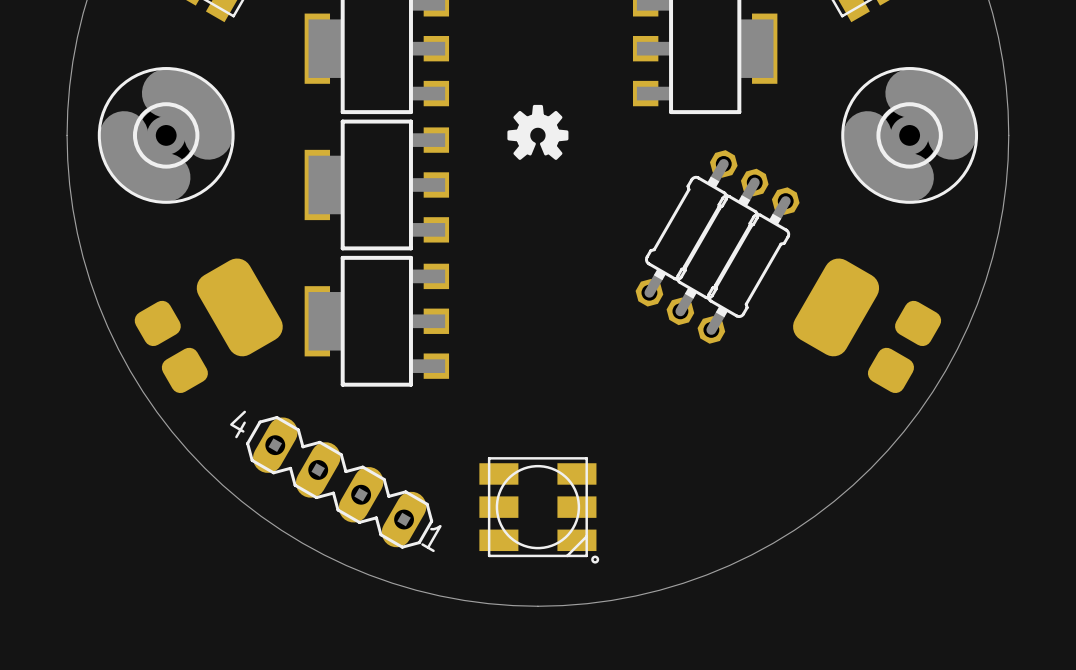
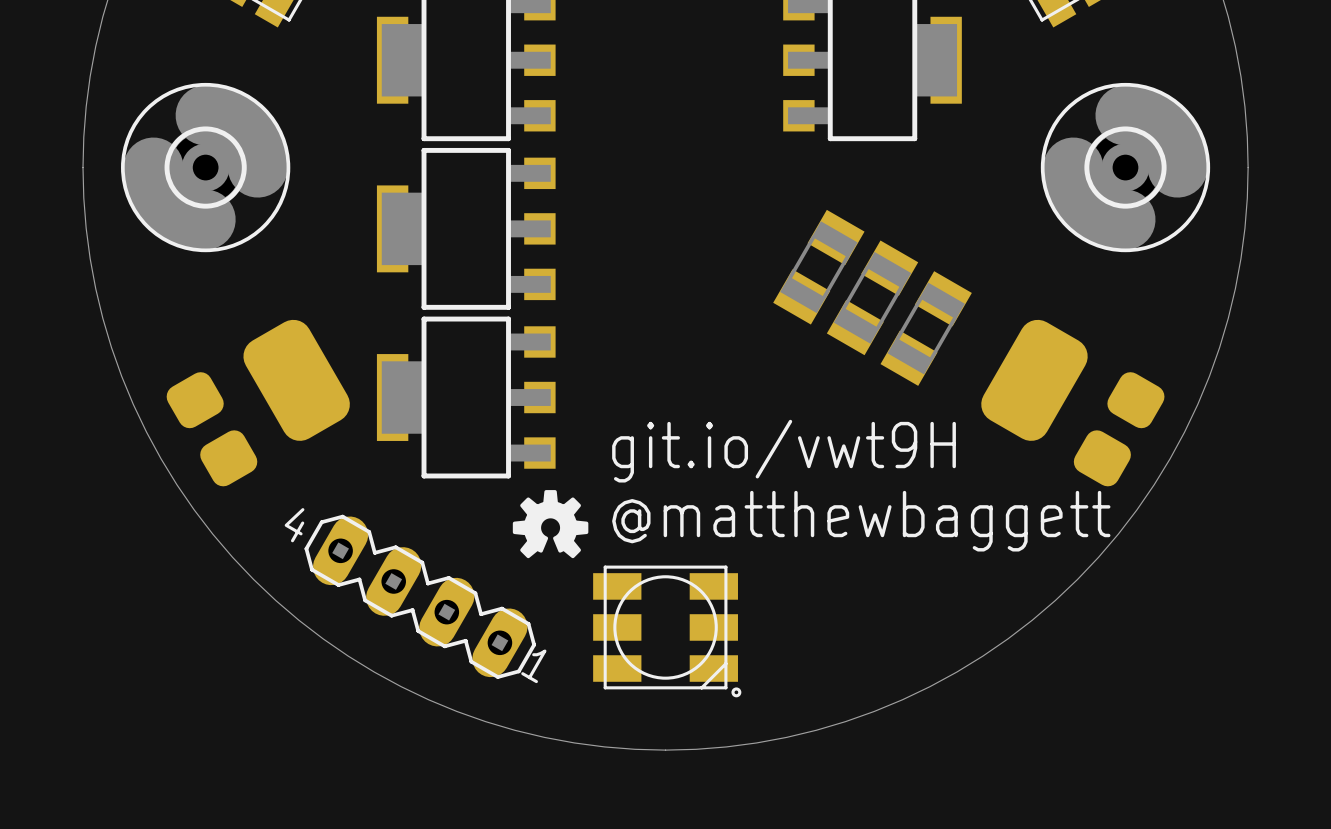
drawing position: (537, 132) -> (550, 524)
part footprint: [697, 187, 800, 344] -> [880, 271, 972, 386]
part: none -> (818, 267)
part: (686, 228) -> none
part: none -> (872, 297)
part: (717, 246) -> none
text: none -> git.io/vwt9H (784, 451)
text: none -> @matthewbaggett (861, 521)

